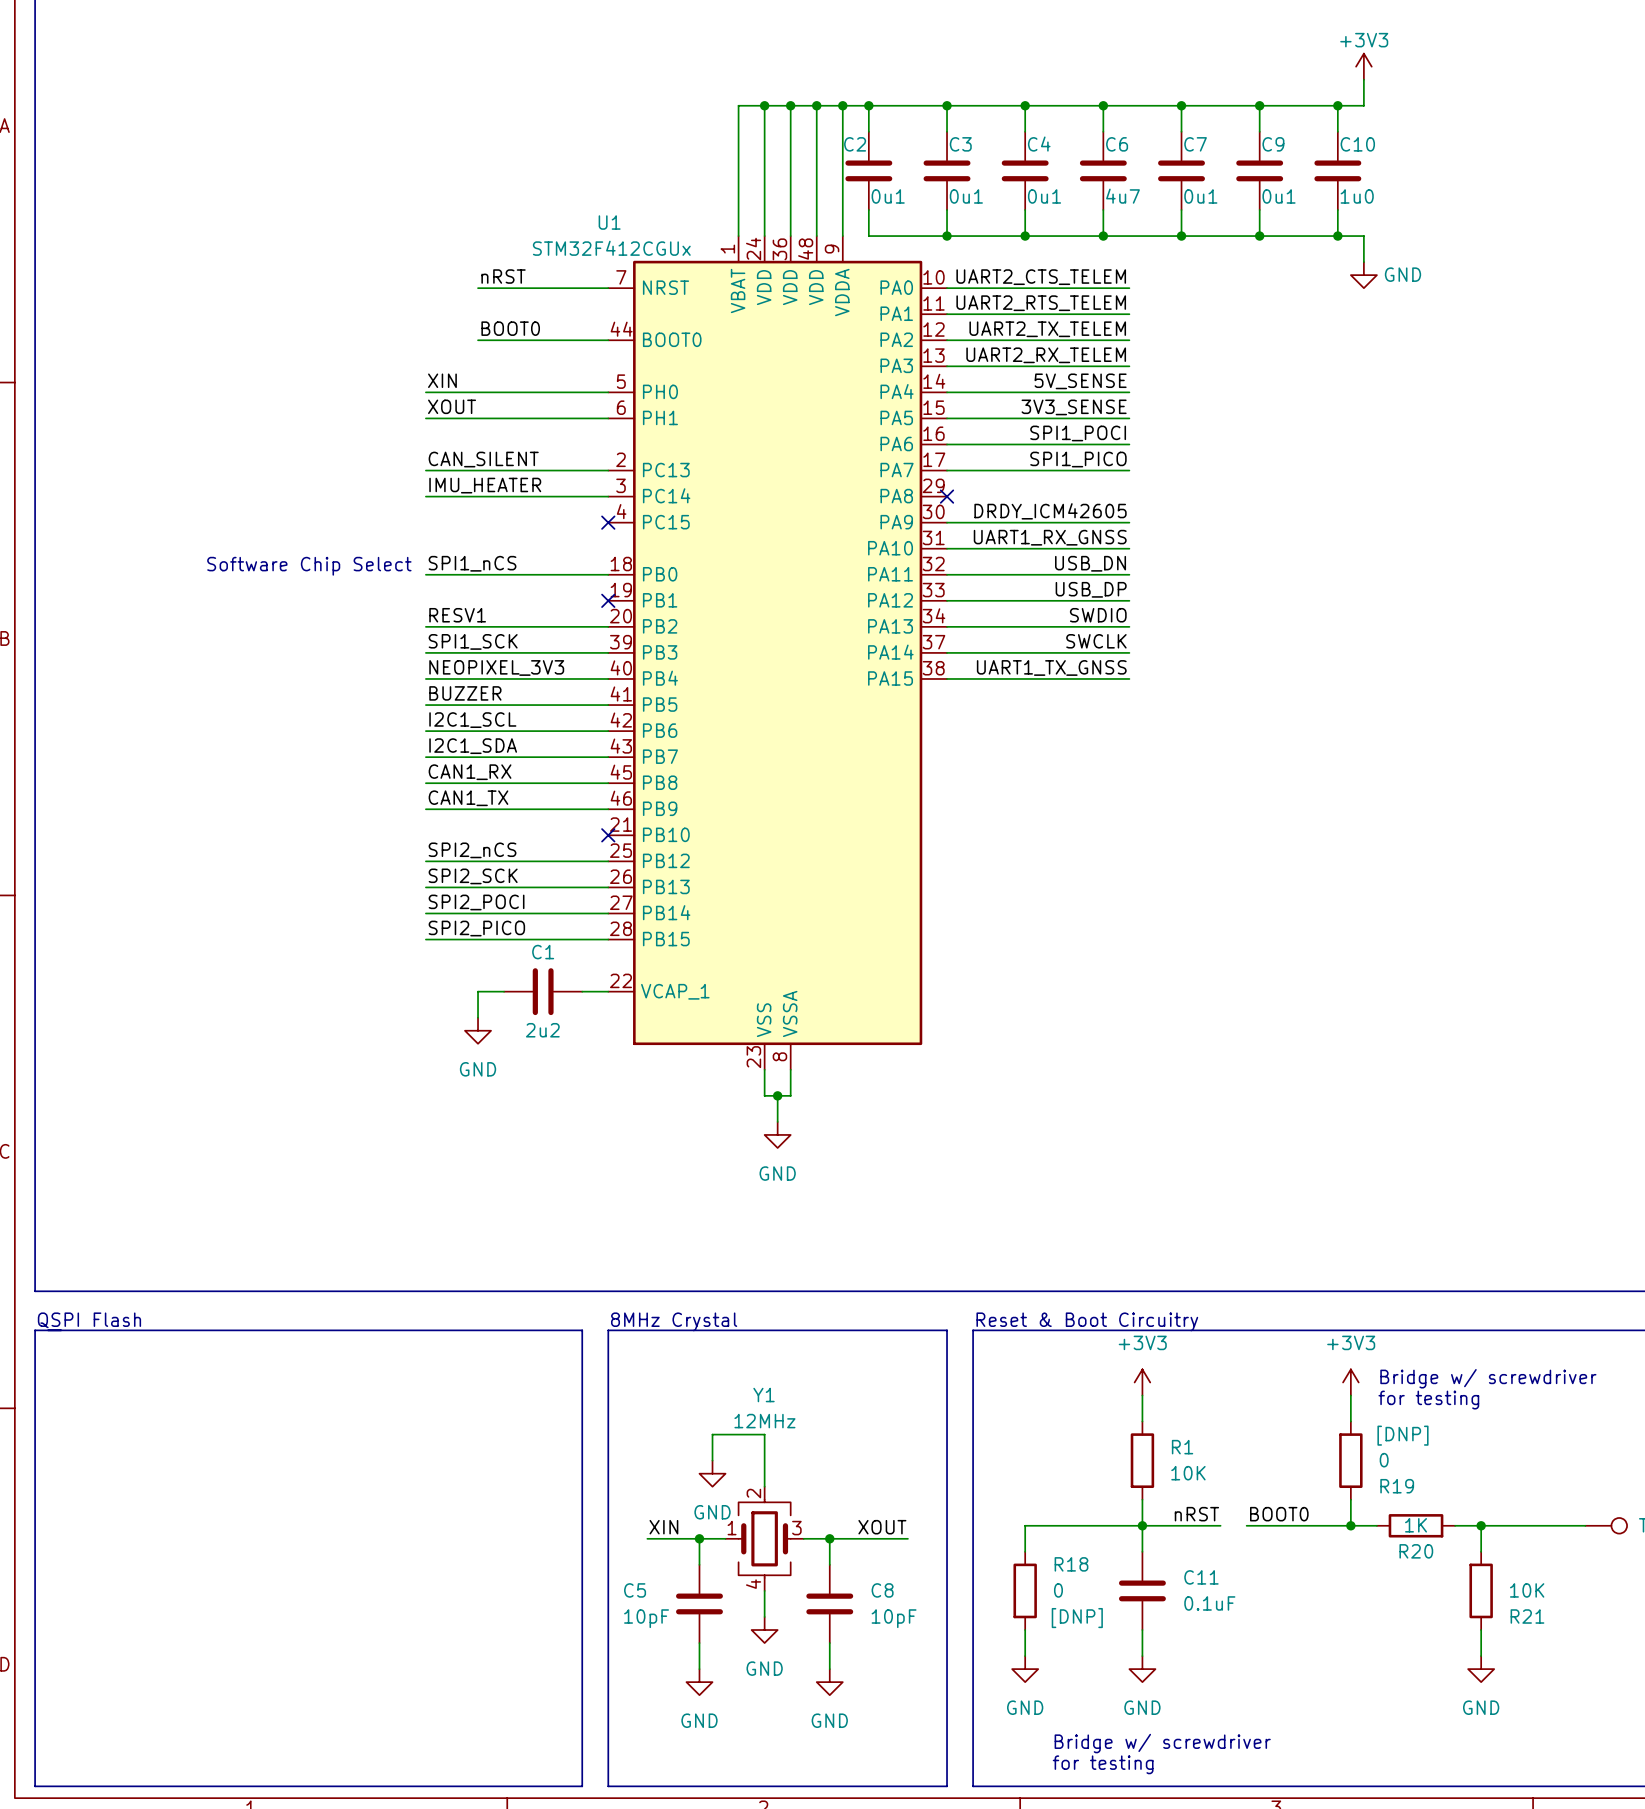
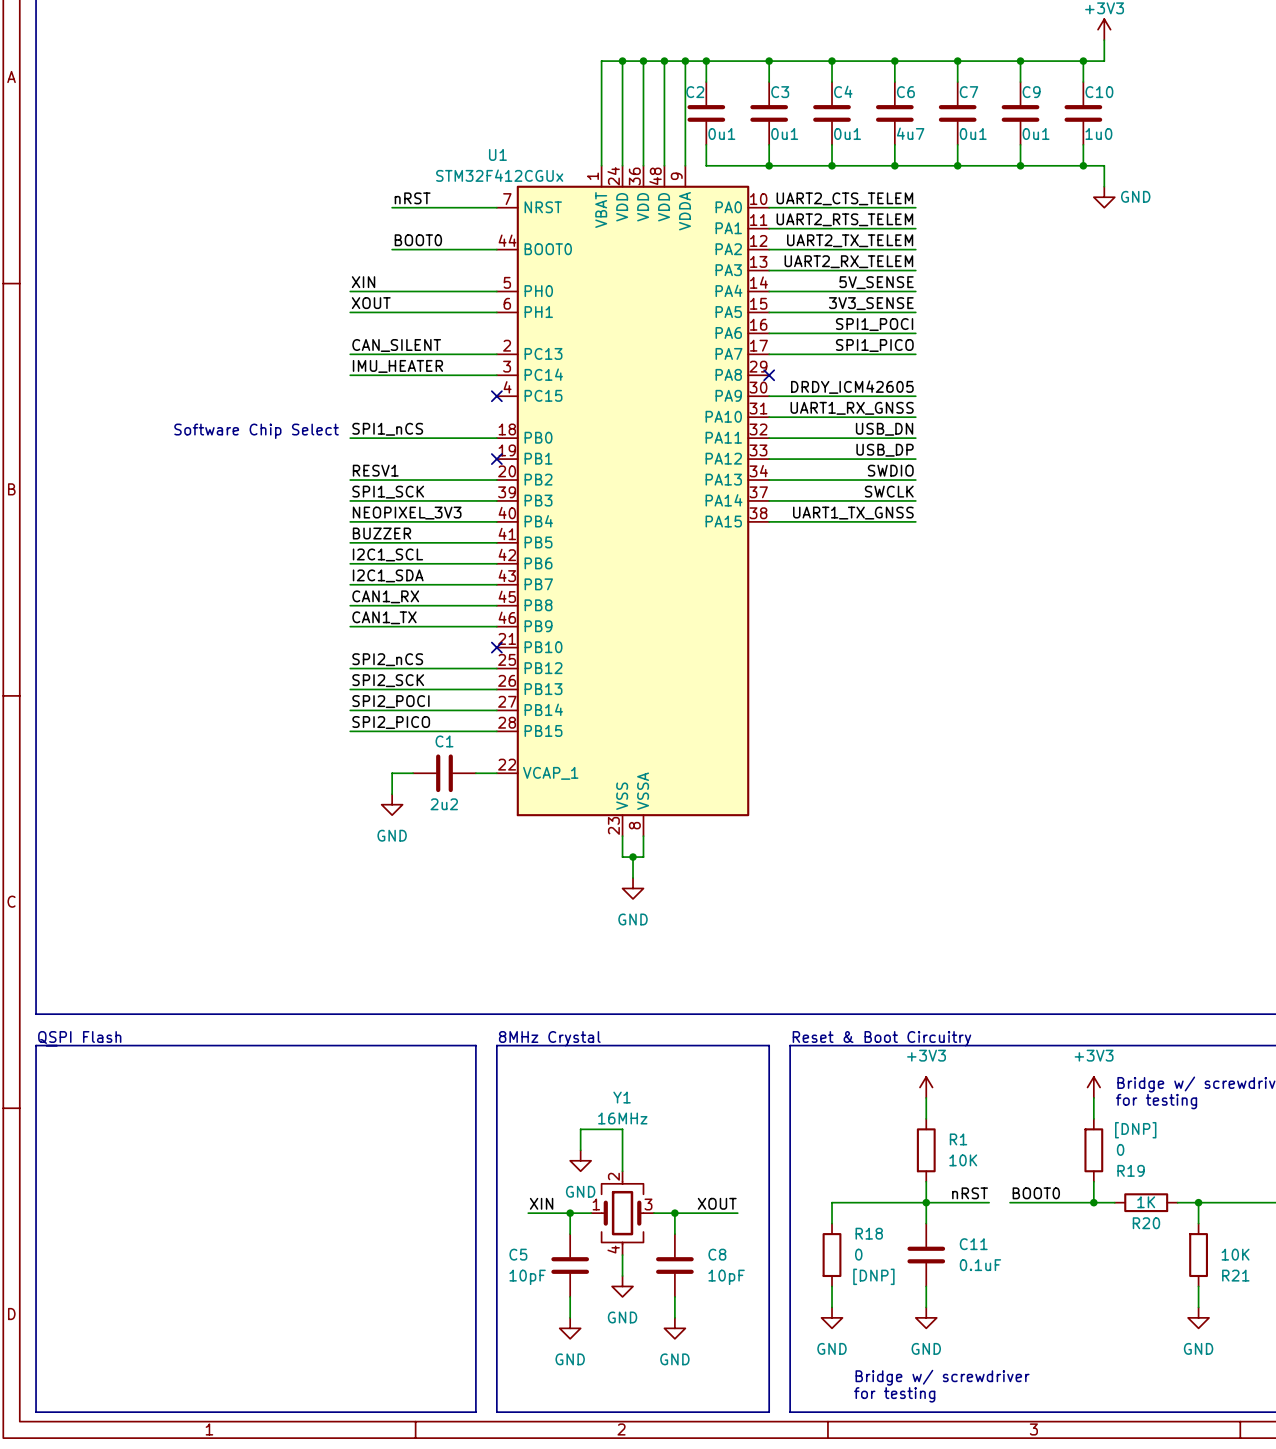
Y1 value: 12MHz (764, 1421) -> 16MHz (622, 1118)

